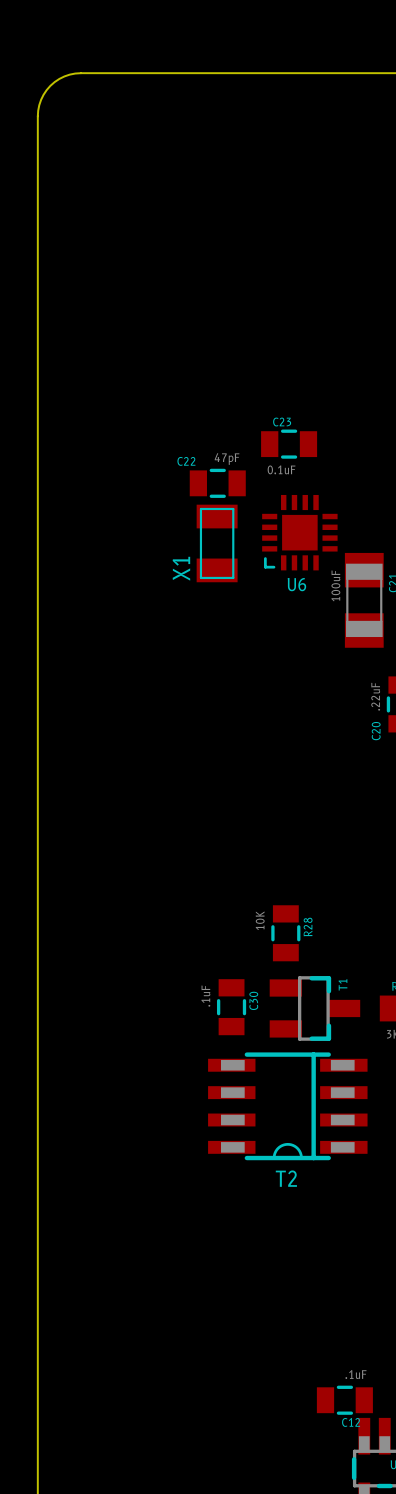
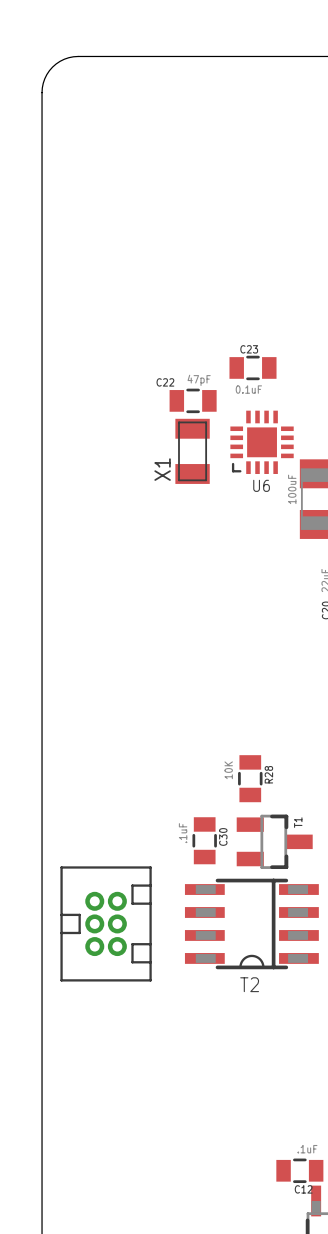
part: none -> (106, 923)

